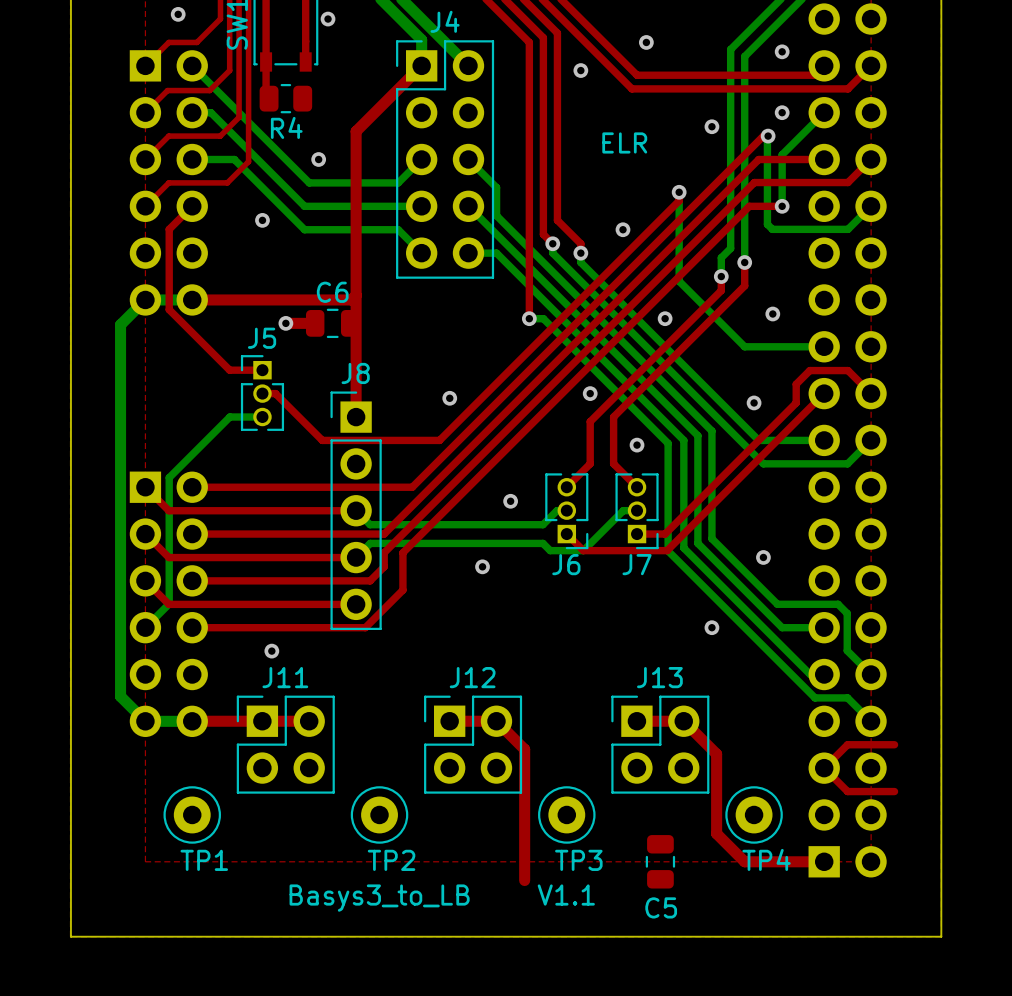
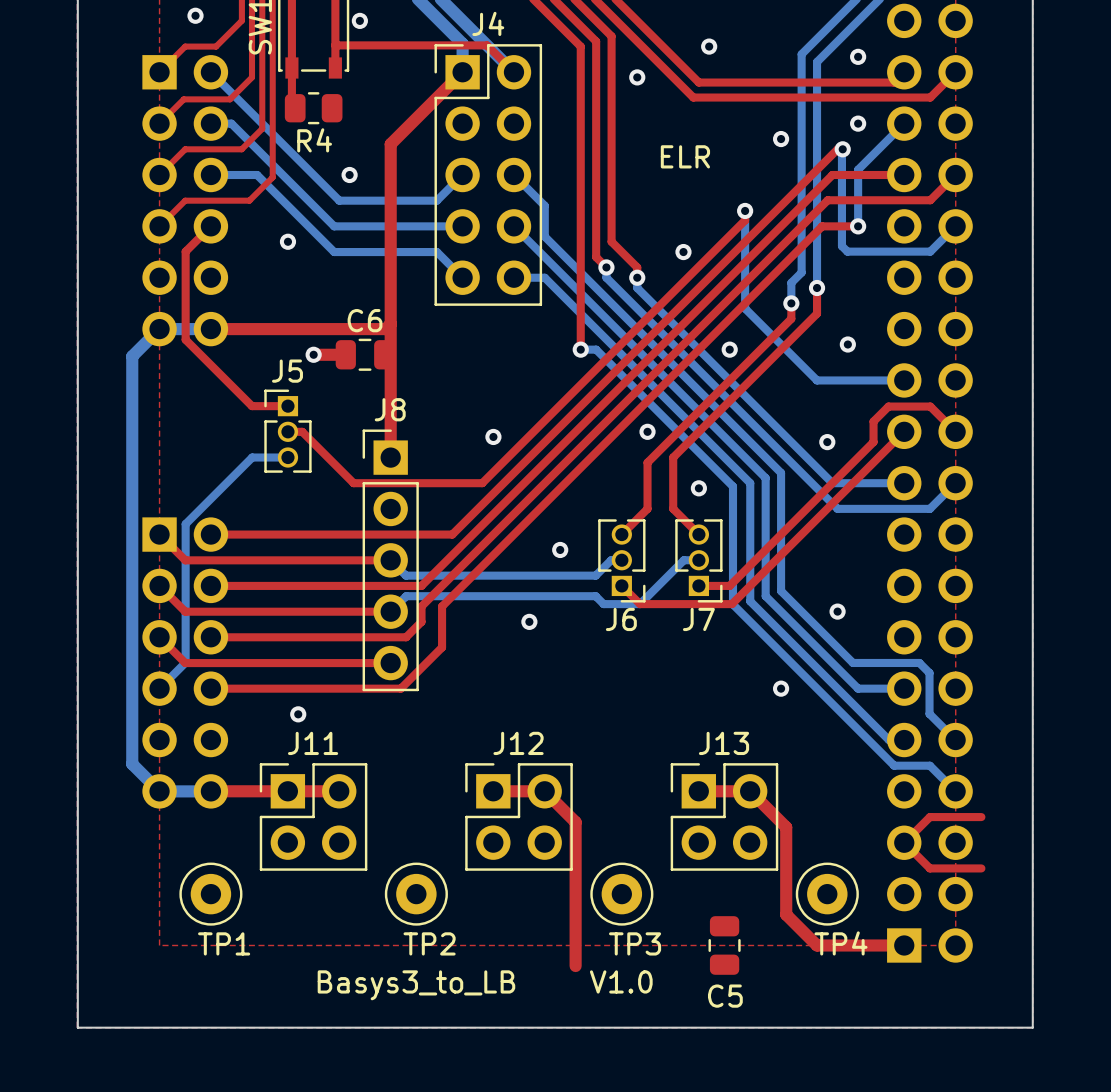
top track: none -> (335, 45) (487, 45) (513, 72)
text: V1.1 (566, 895) -> V1.0 (621, 981)

